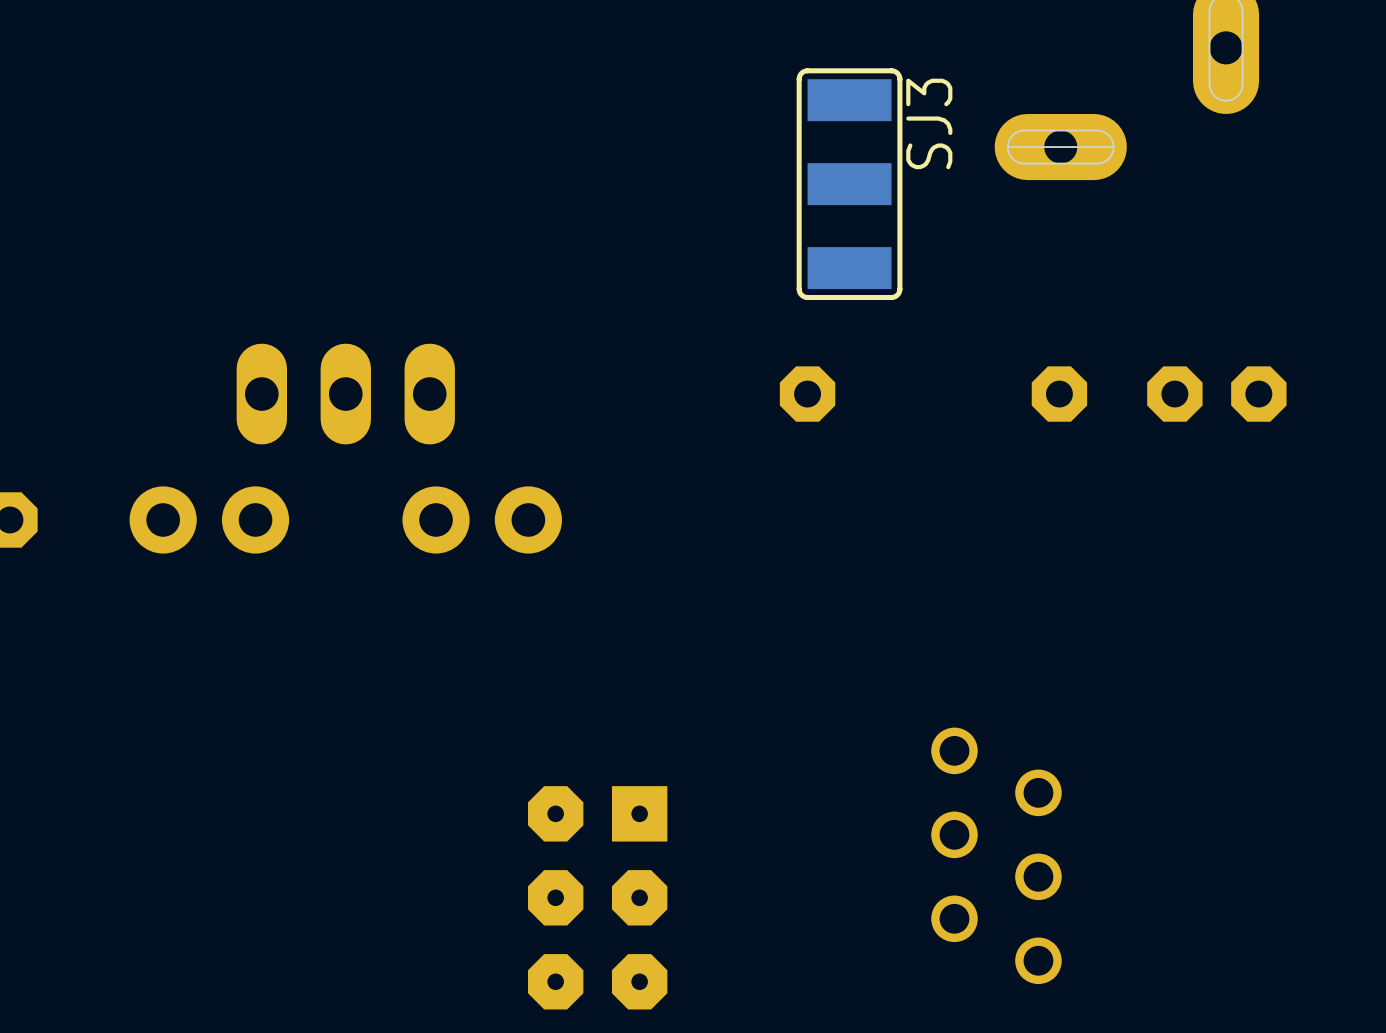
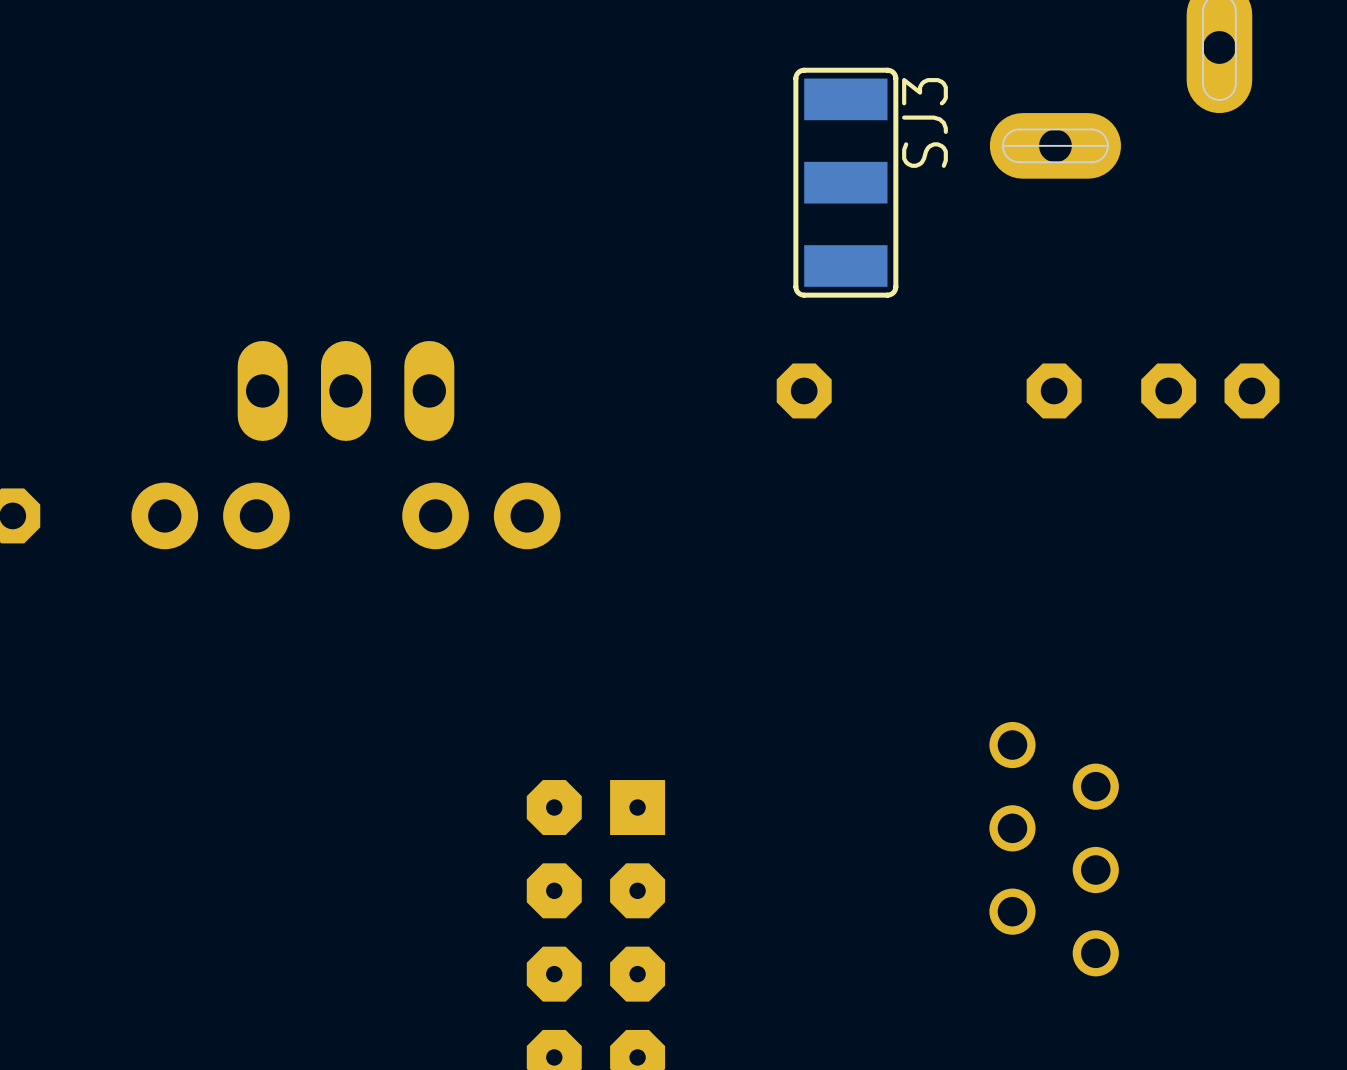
part position: (996, 855) -> (1054, 849)

